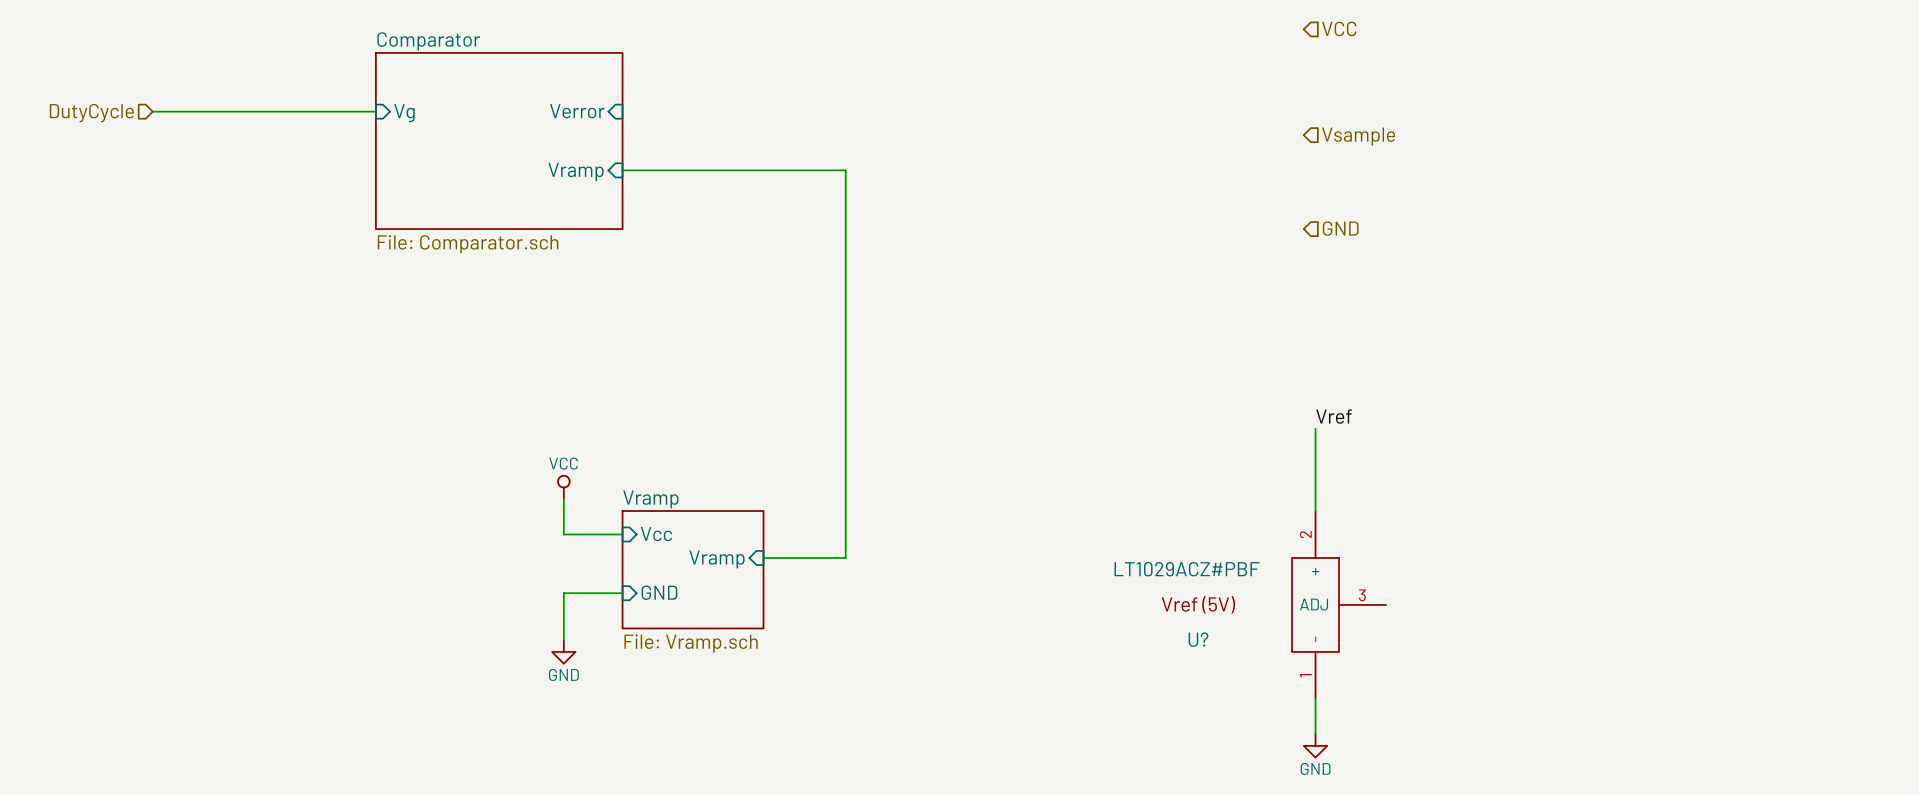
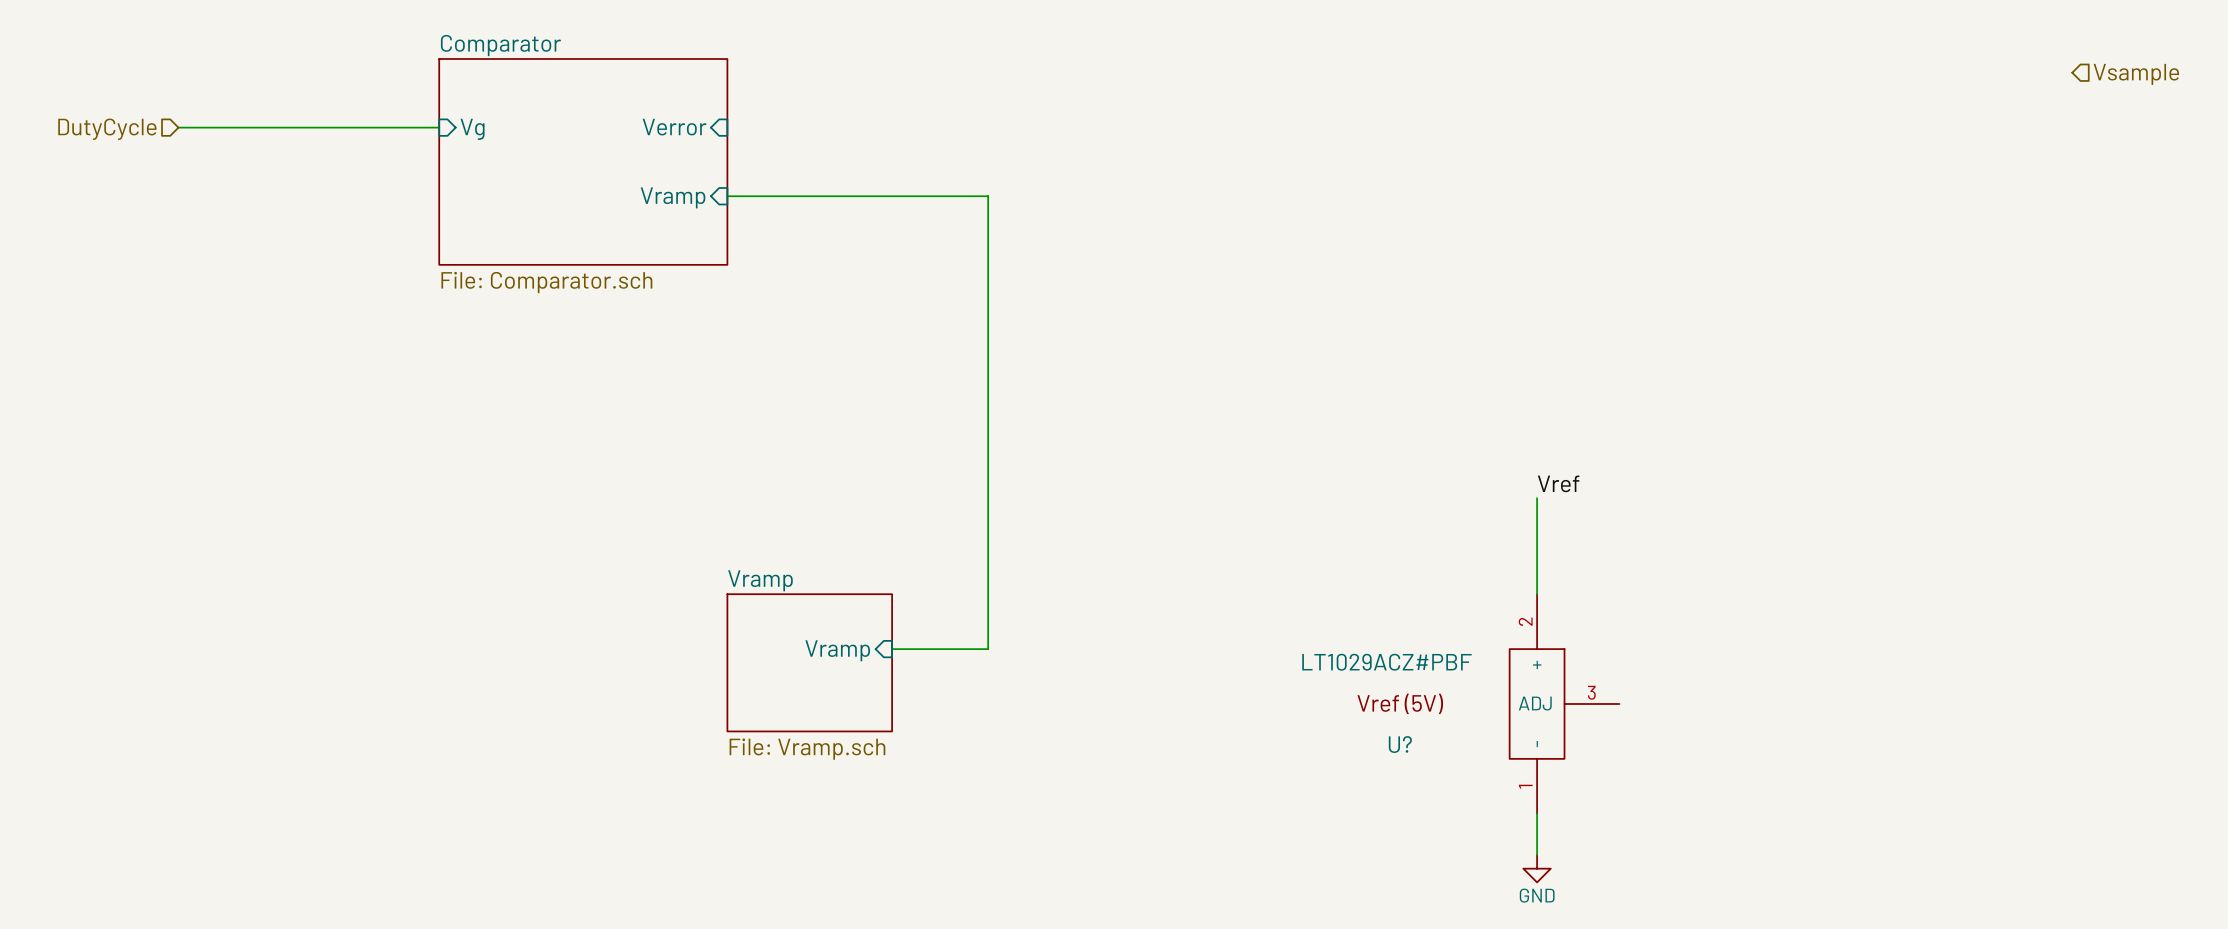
hierarchical label: VCC (1339, 28) -> none
hierarchical label: none -> Vsample (2136, 74)
hierarchical label: Vsample (1358, 136) -> none
hierarchical label: GND (1340, 228) -> none
power symbol: VCC (563, 487) -> none
wire: (563, 499) (563, 534) (622, 534) -> none
sheet pin: Vcc (656, 534) -> none
sheet pin: GND (659, 592) -> none
wire: (622, 593) (563, 593) (563, 640) -> none
power symbol: GND (563, 651) -> none

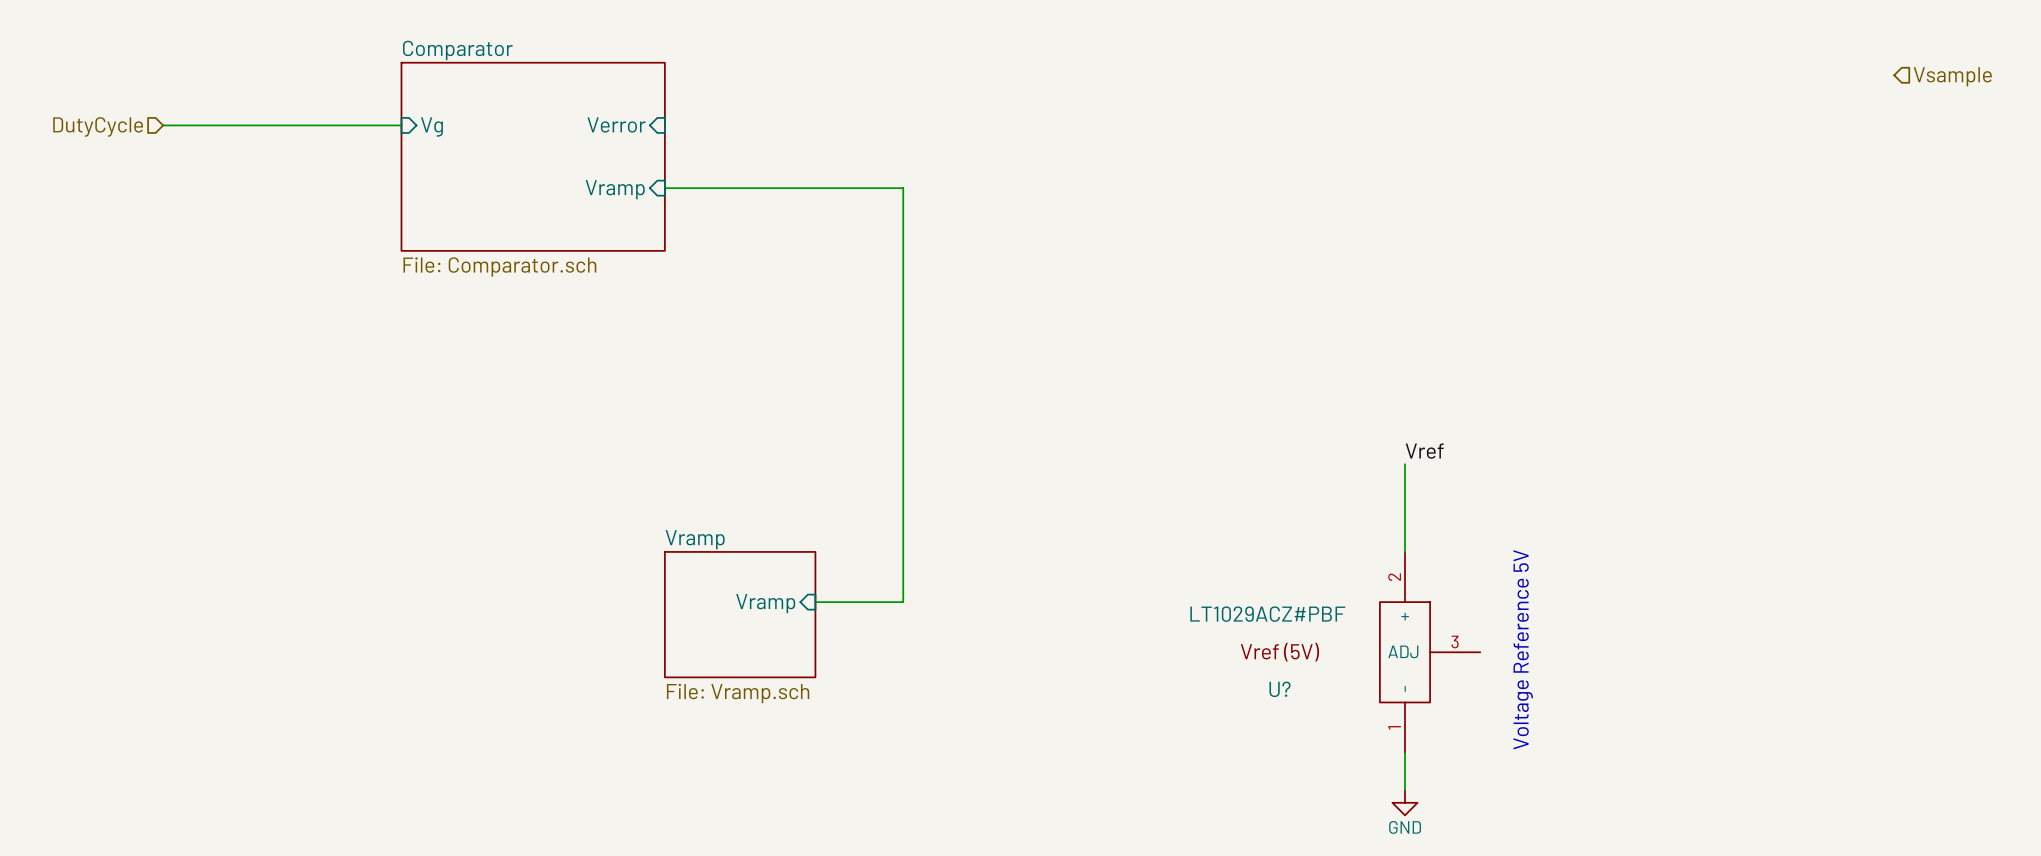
text: none -> Voltage Reference 5V (1523, 649)

